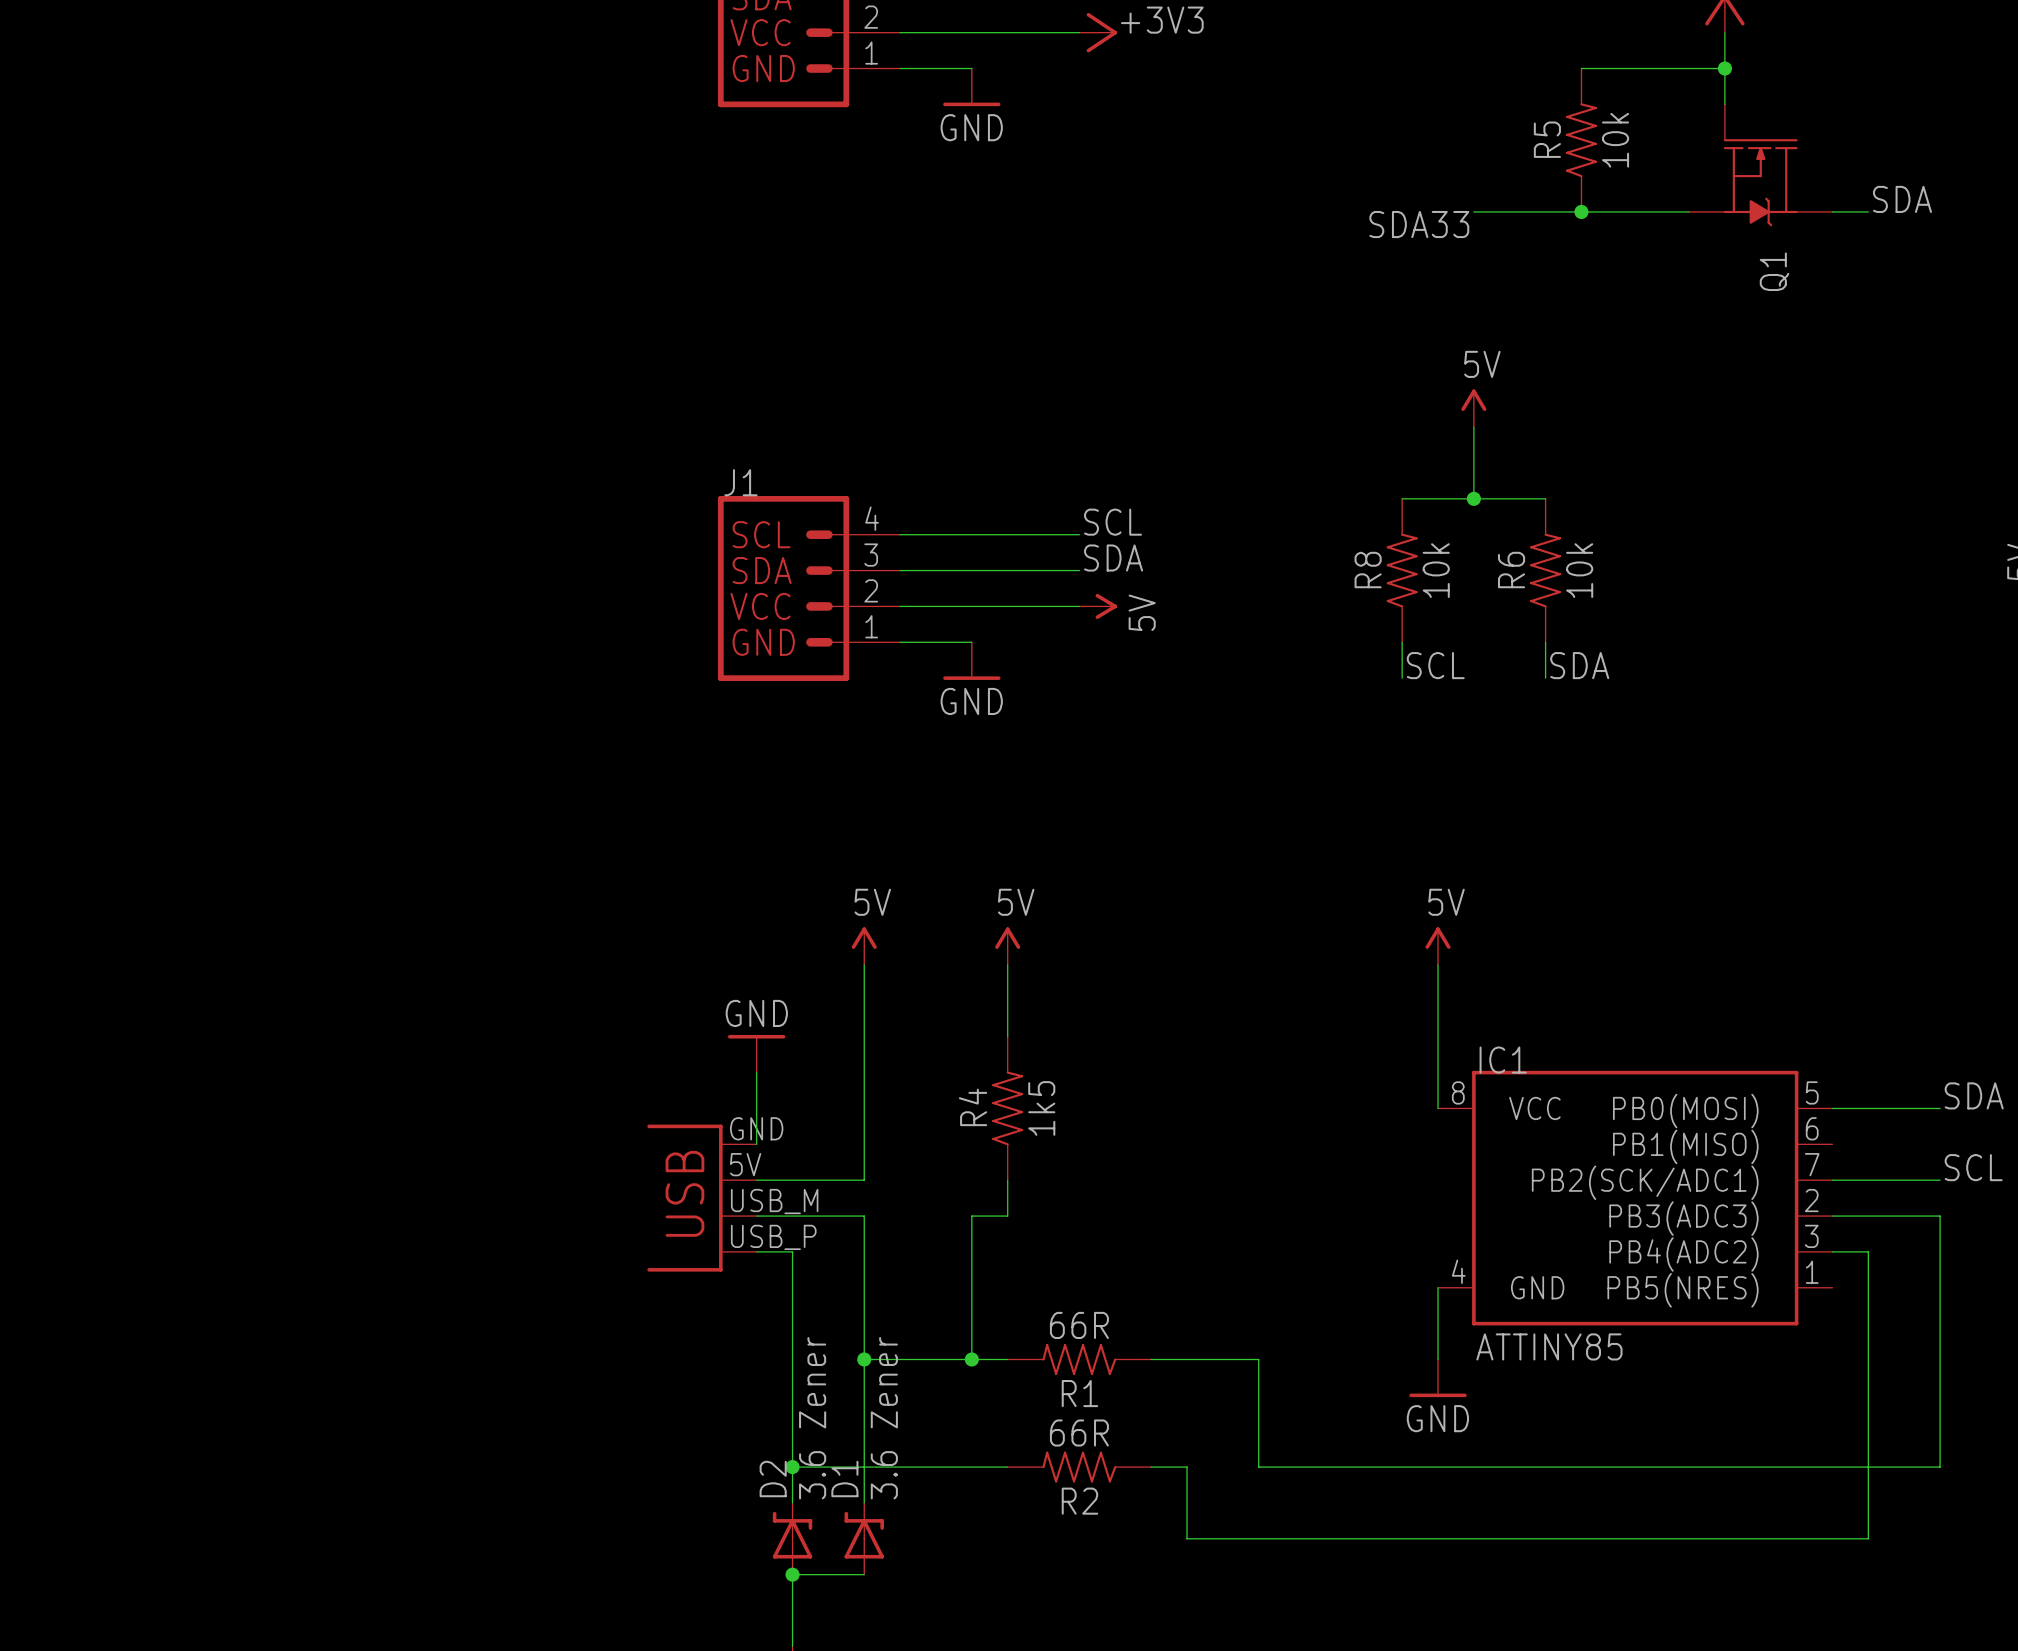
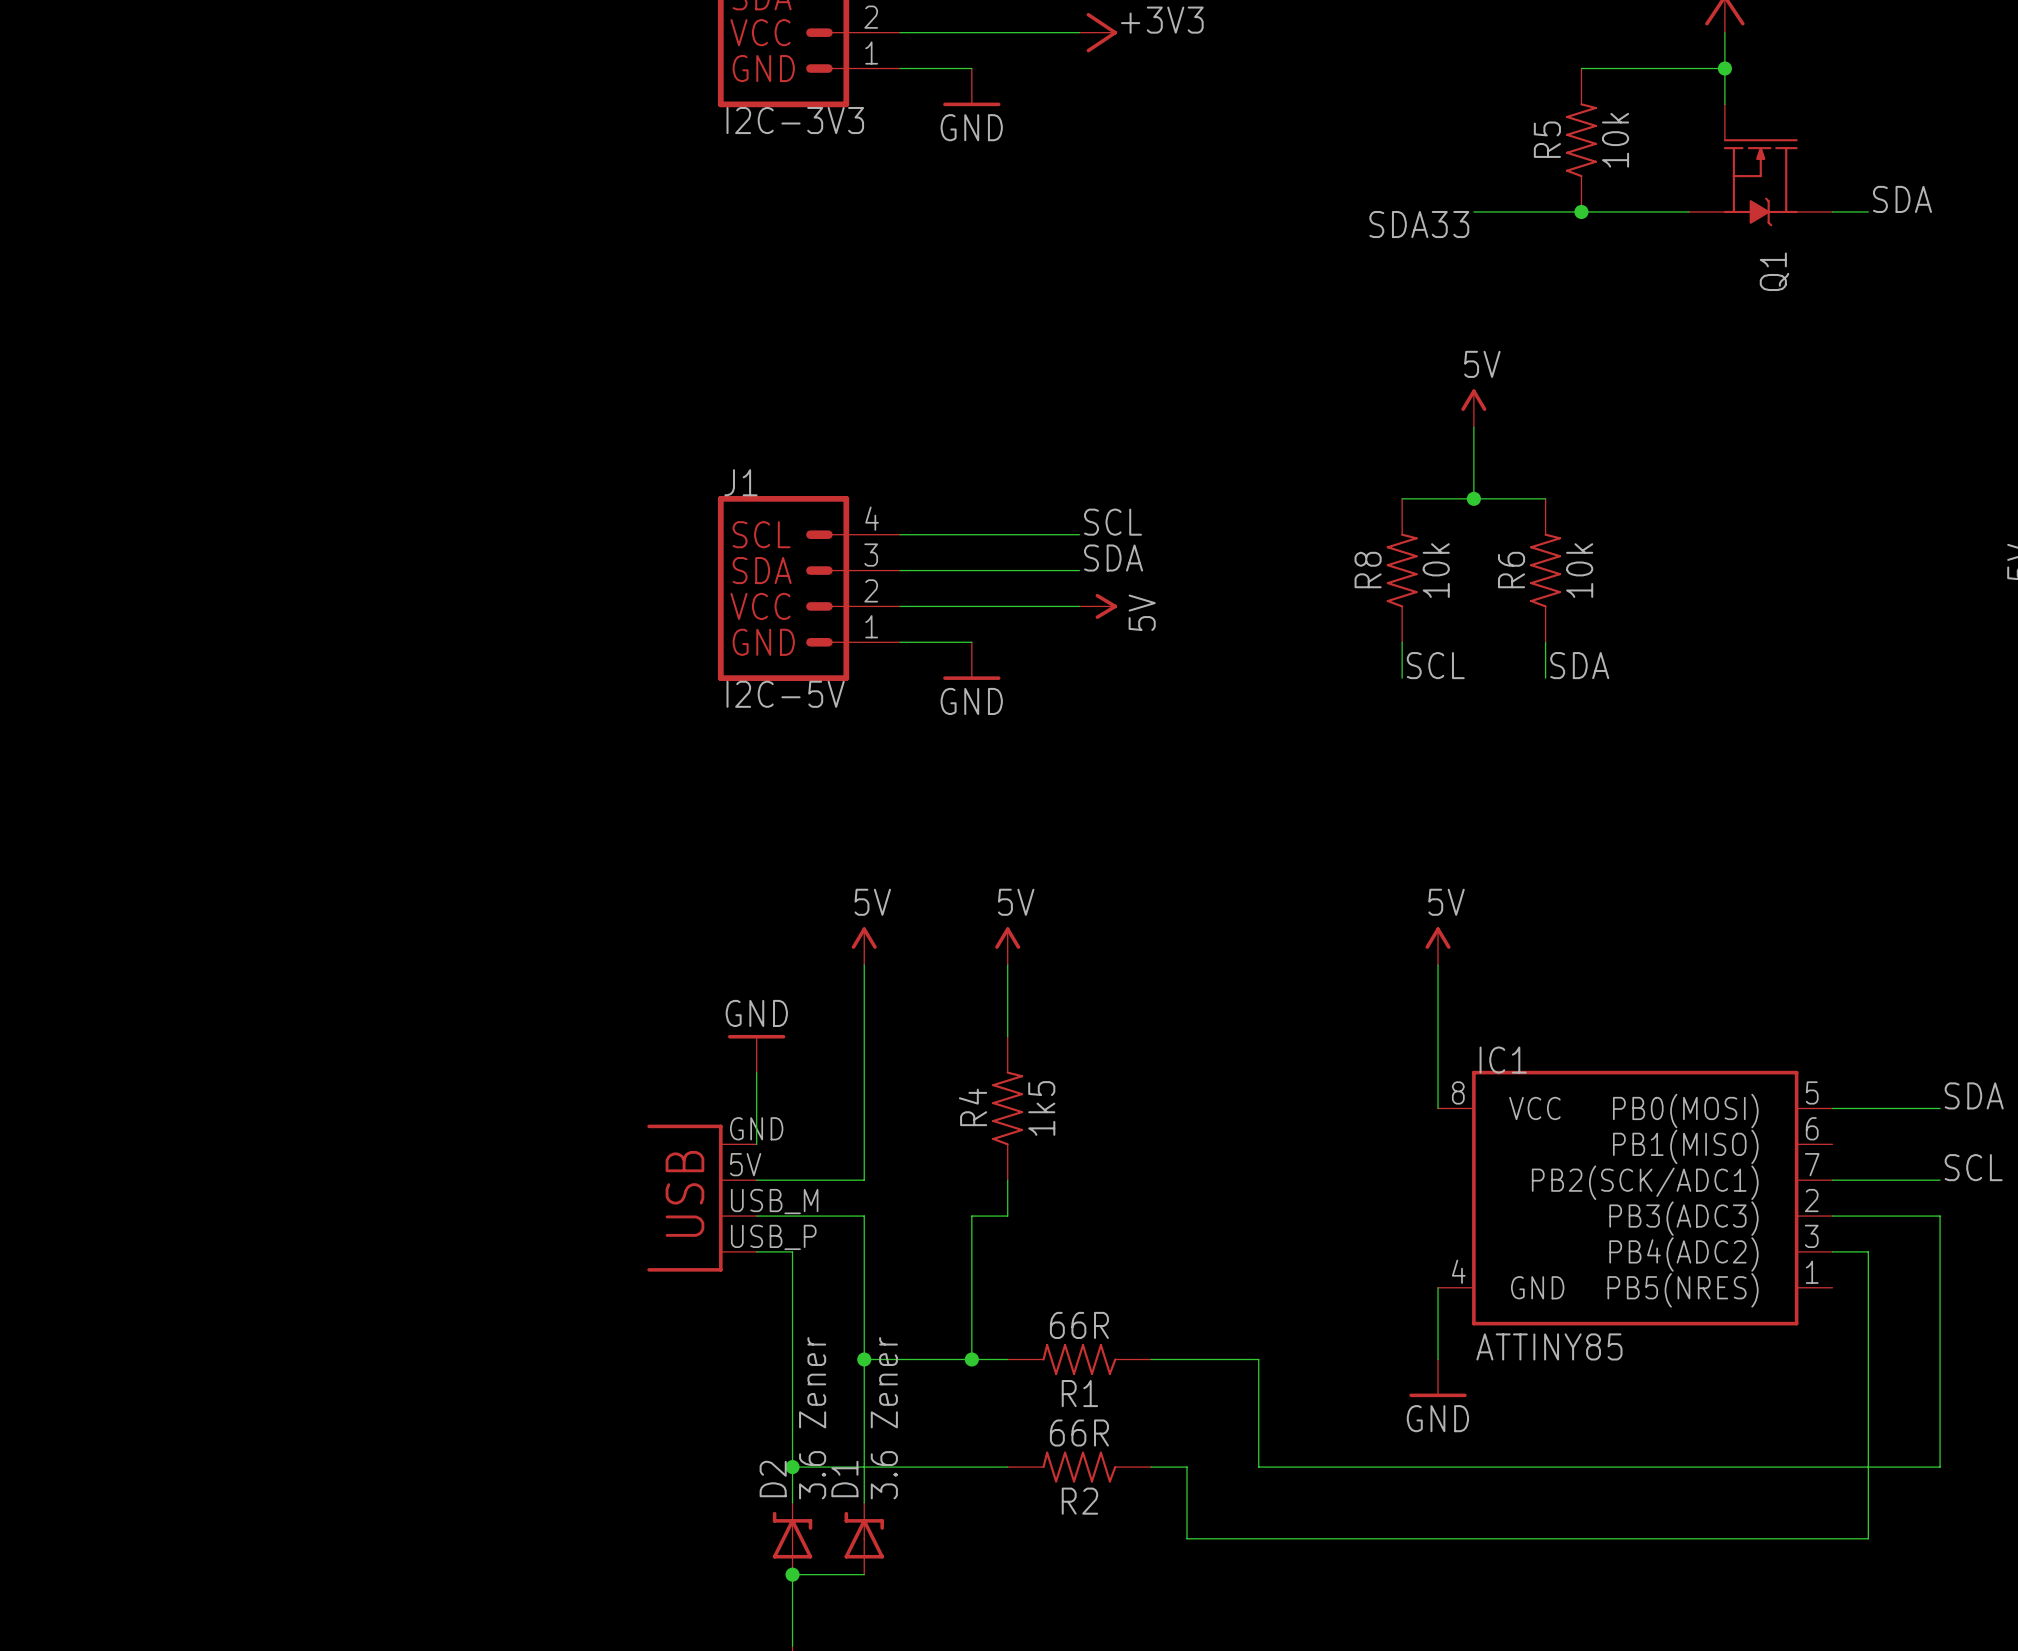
part value: none -> I2C-3V3 (795, 120)
J1 value: none -> I2C-5V (785, 694)

